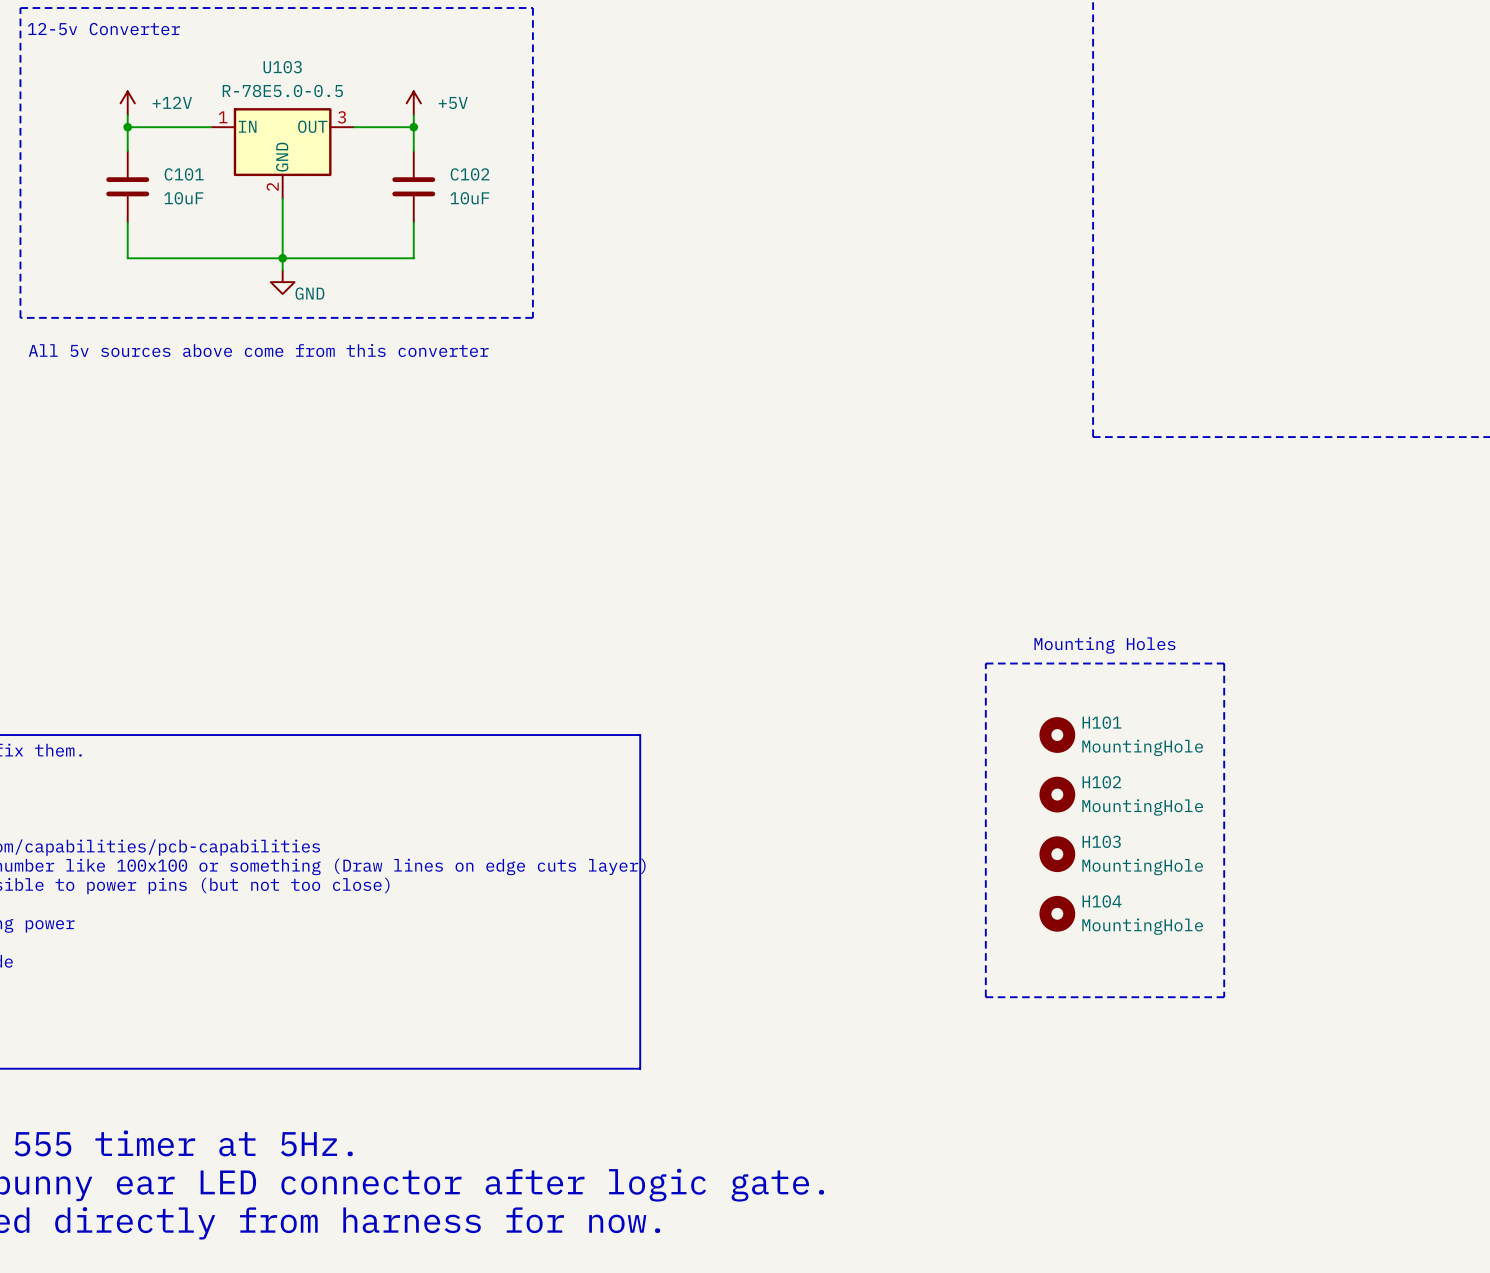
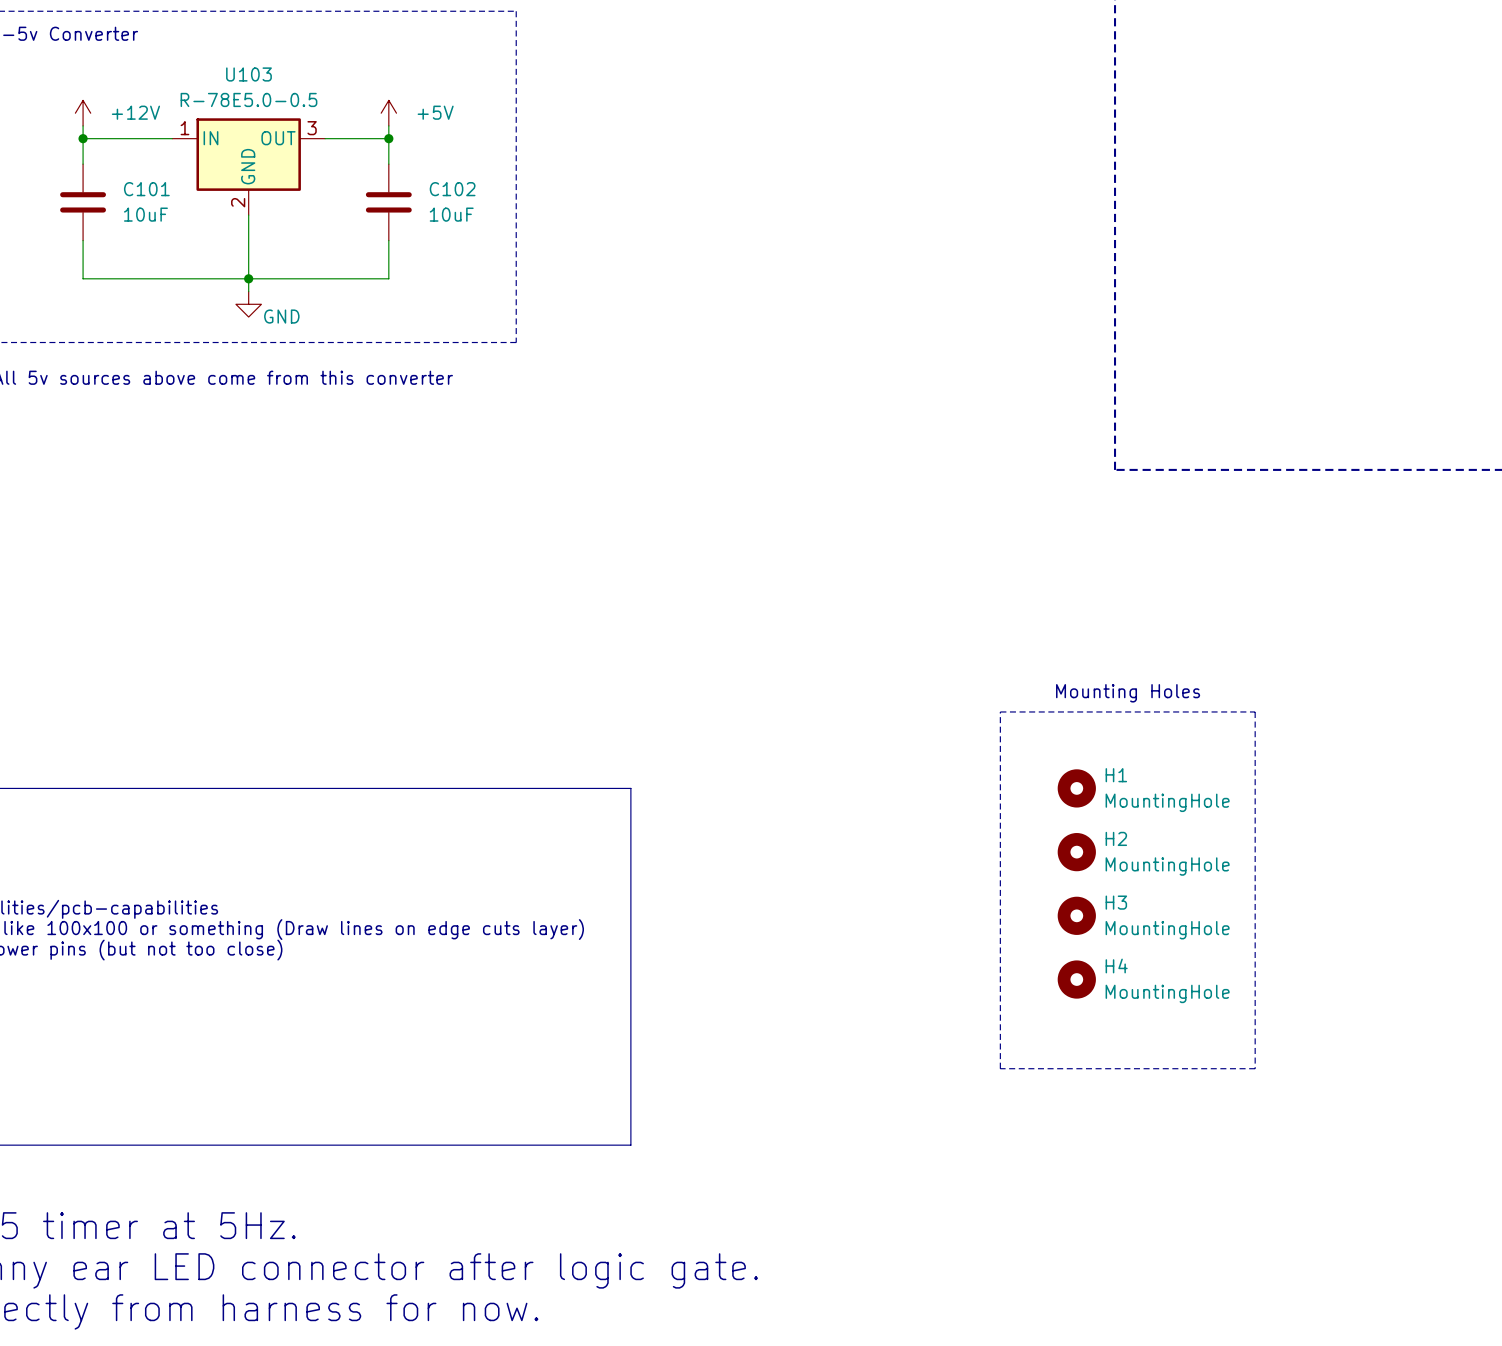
H101 name: H101 (1101, 722) -> H1 (1116, 775)
H102 name: H102 (1101, 782) -> H2 (1116, 838)
H103 name: H103 (1101, 841) -> H3 (1116, 902)
H104 name: H104 (1102, 901) -> H4 (1116, 966)

